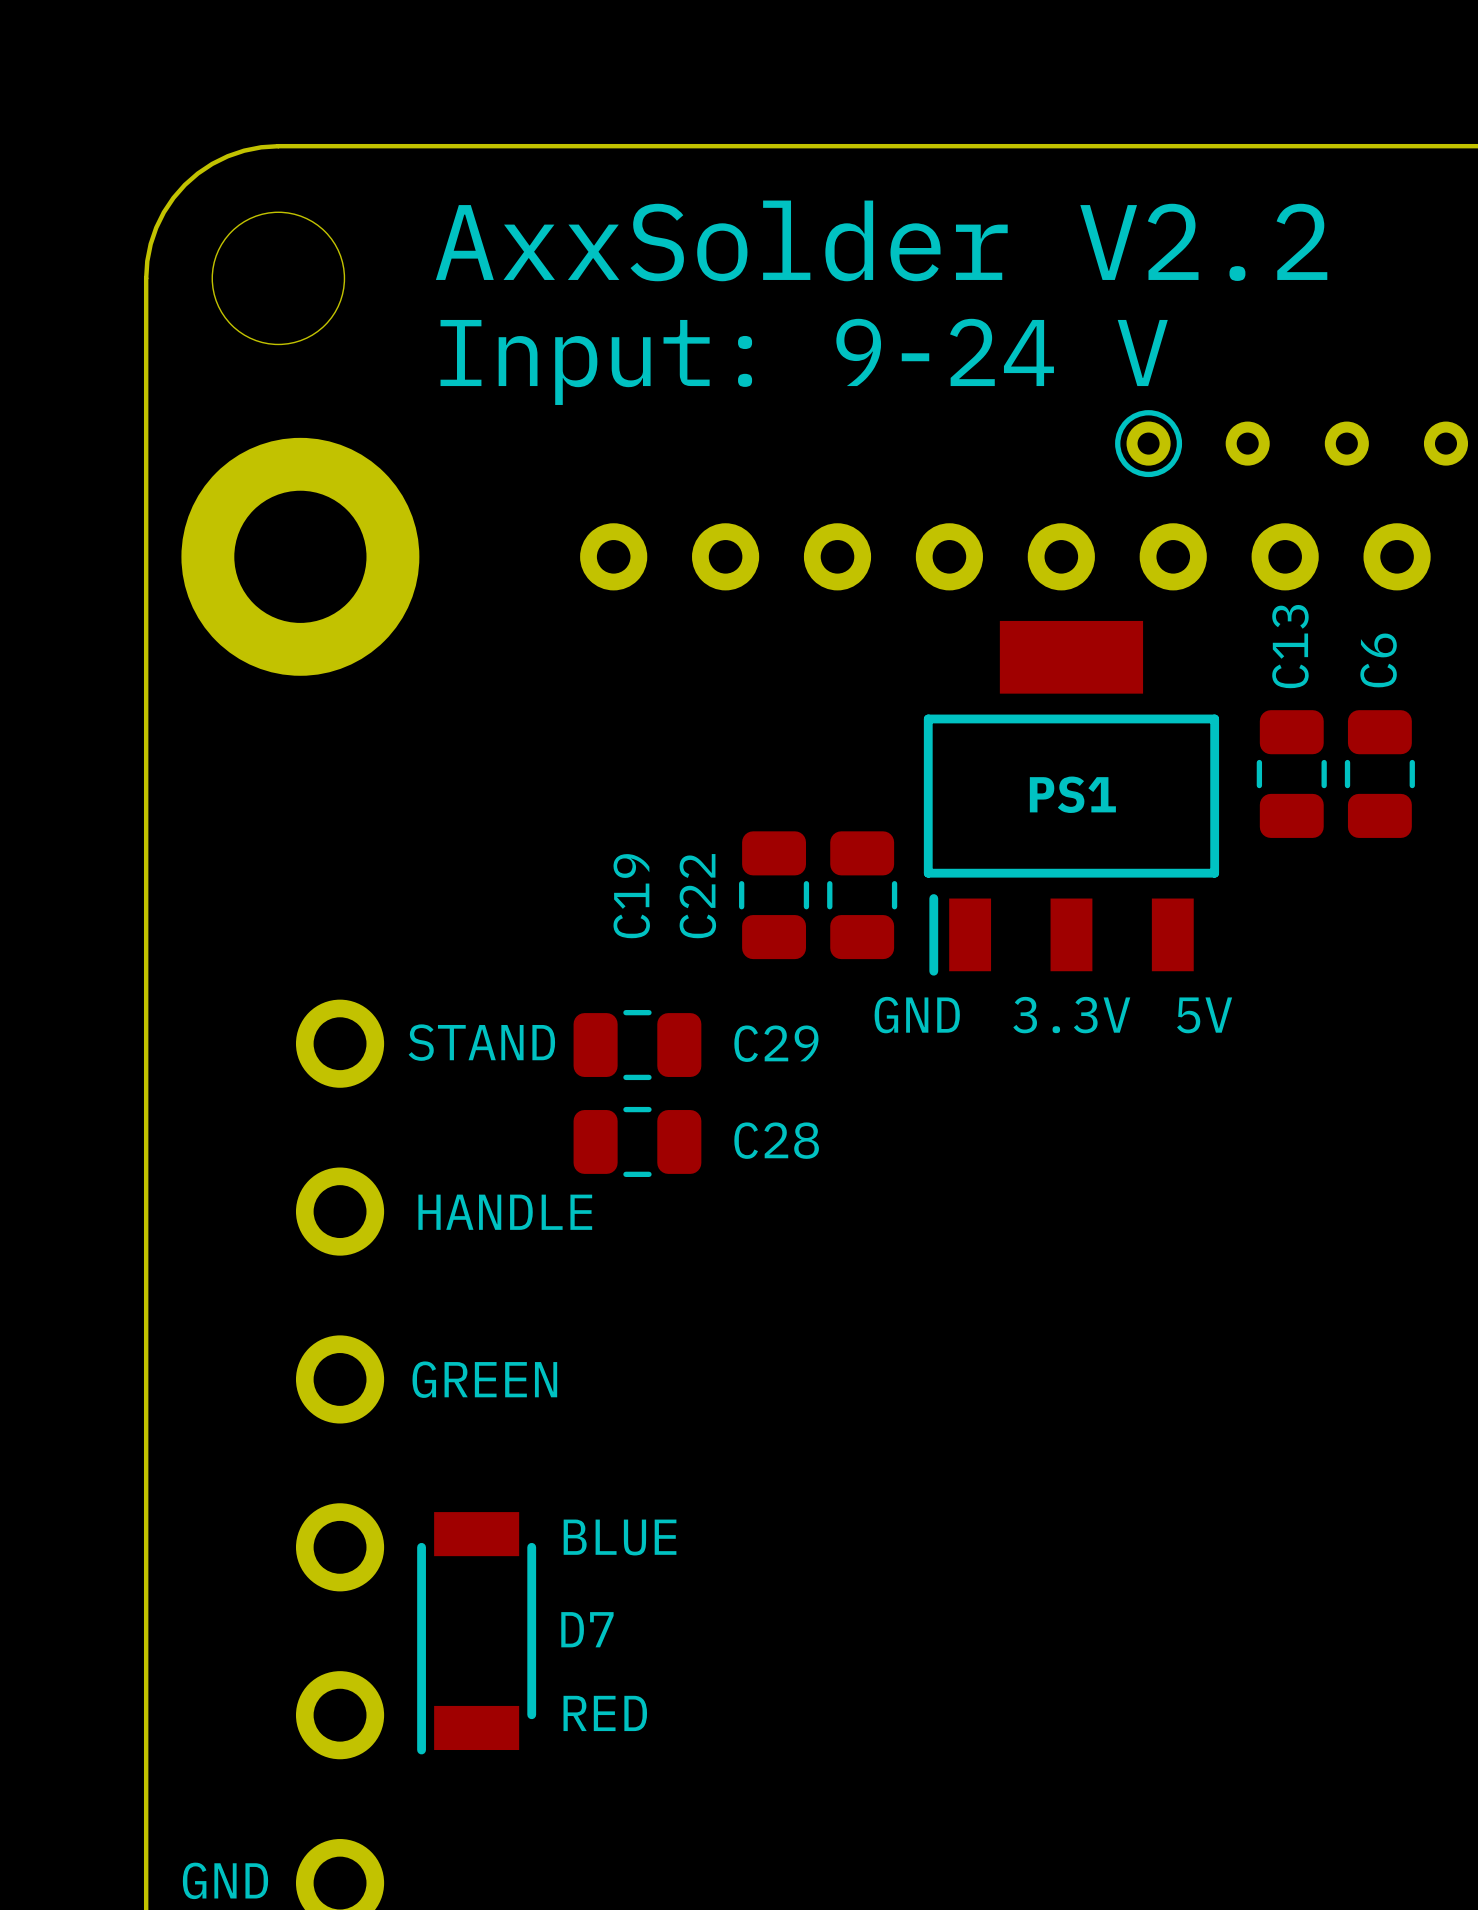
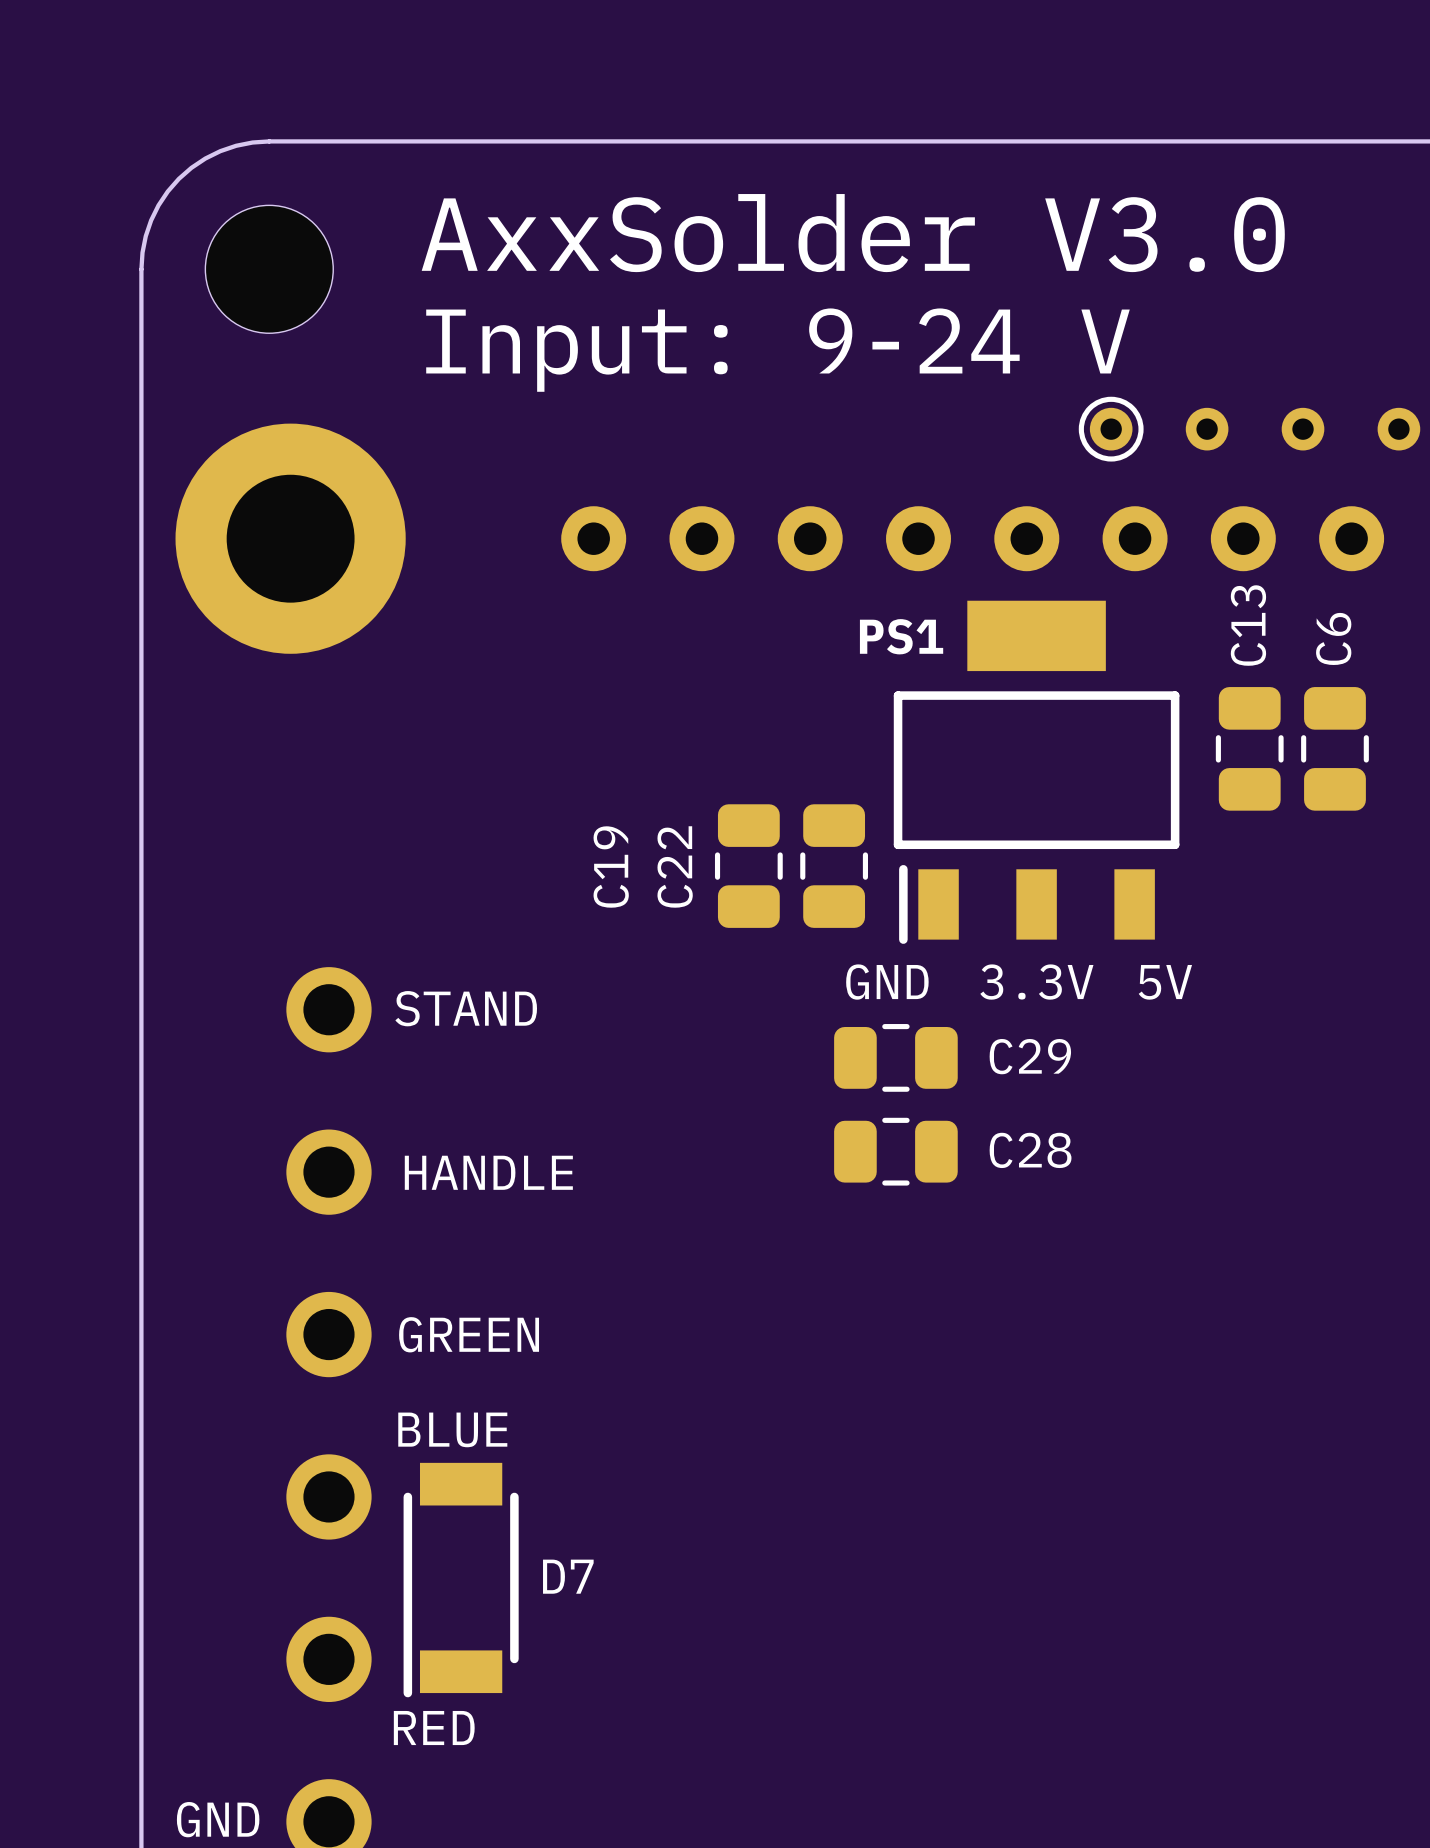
text: AxxSolder V2.2 (881, 240) -> AxxSolder V3.0 (853, 233)
PS1 name position: PS1 (1072, 794) -> PS1 (901, 636)
C29 position: (637, 1045) -> (895, 1057)
C28 position: (637, 1141) -> (895, 1151)
text position: BLUE (620, 1537) -> BLUE (452, 1429)
text position: RED (605, 1713) -> RED (434, 1728)

